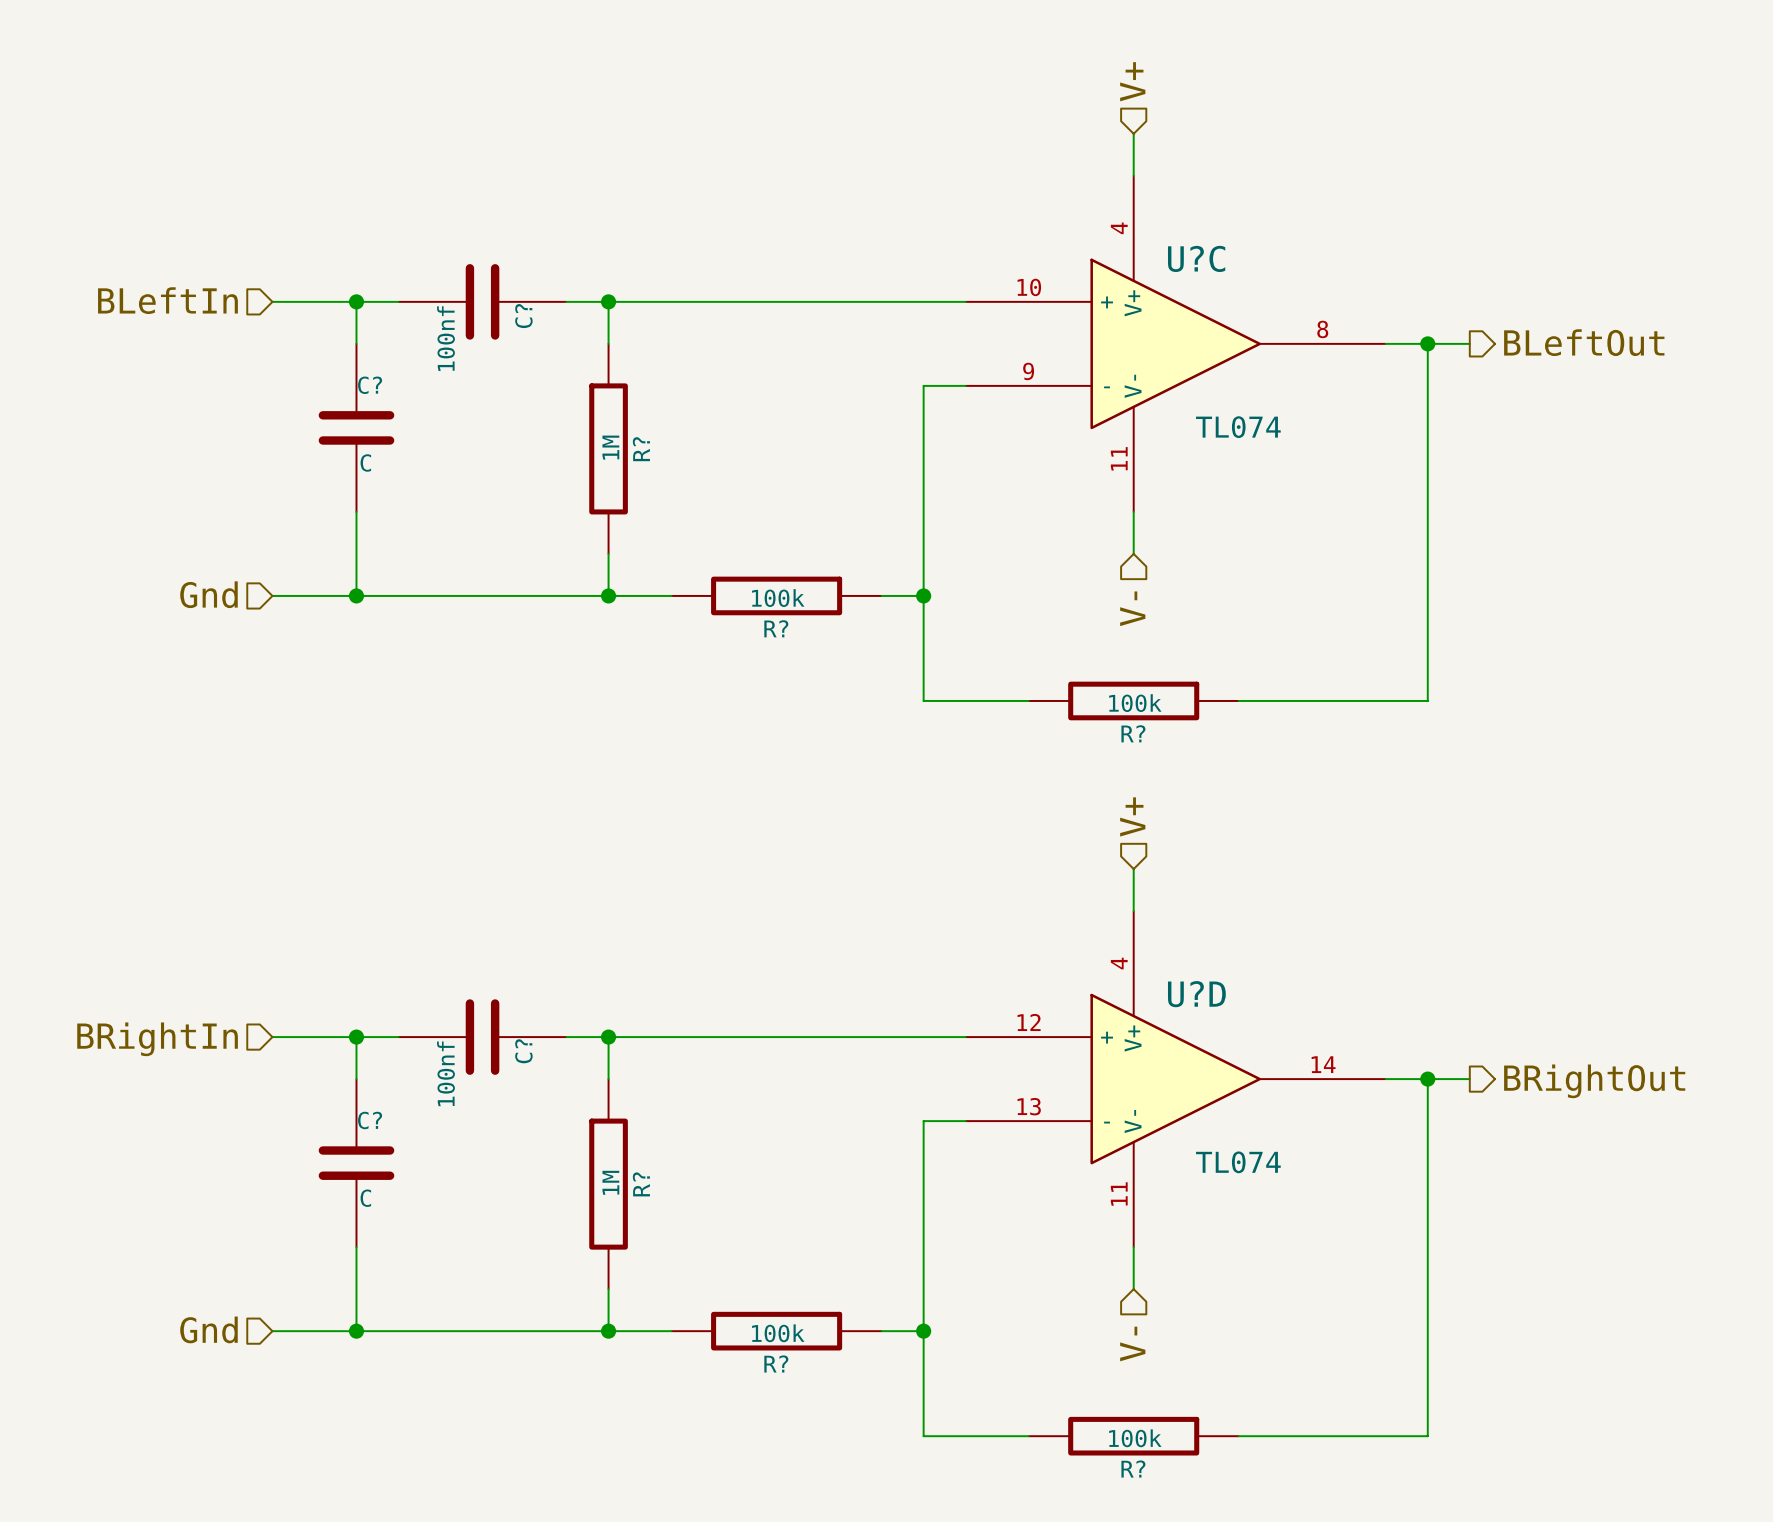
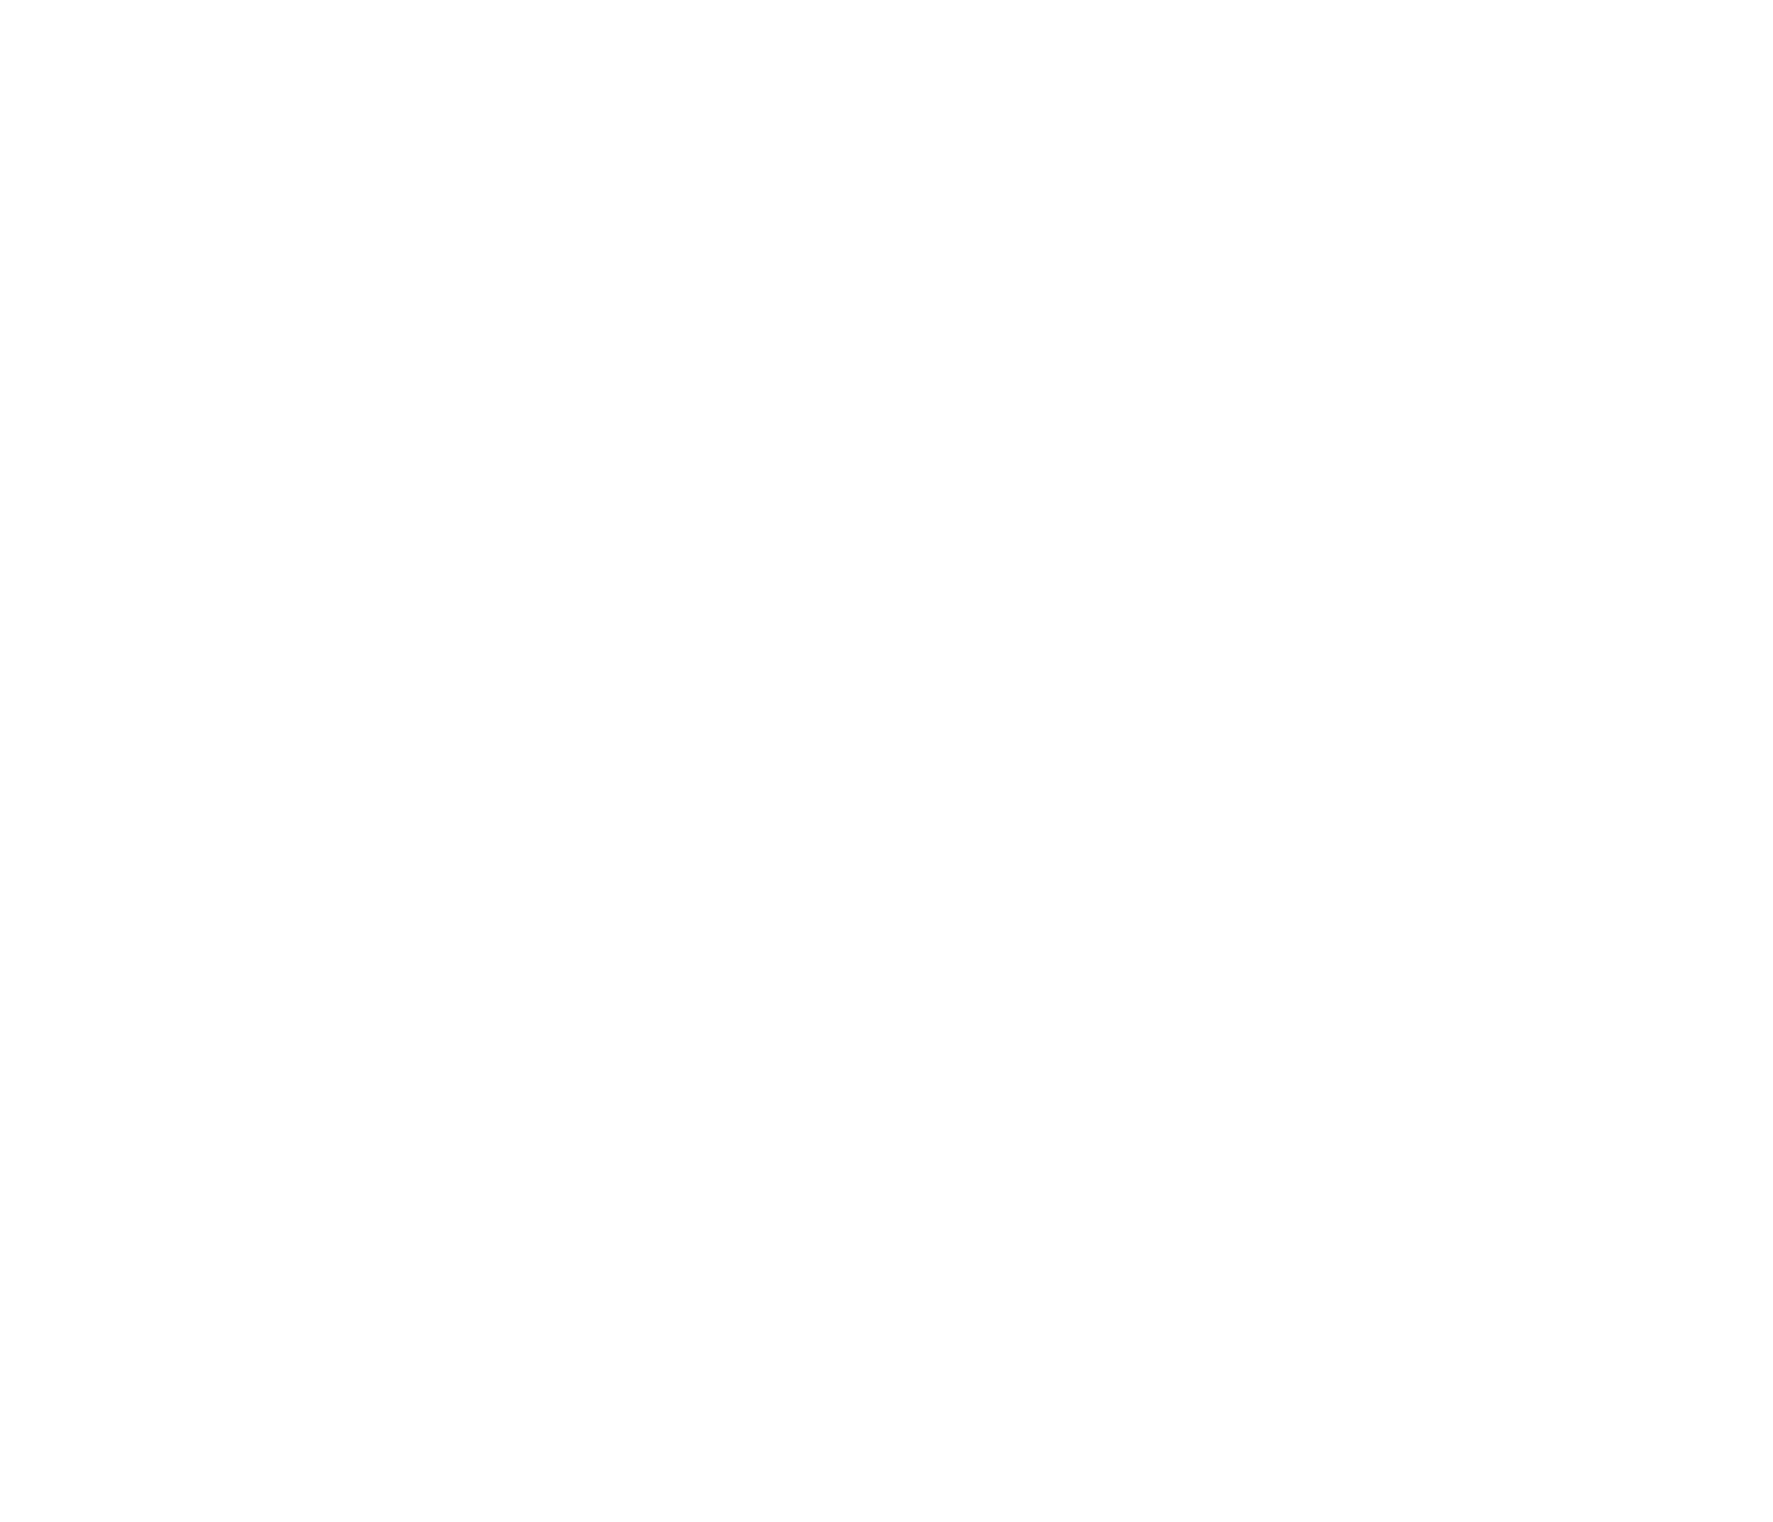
hierarchical label: V+ (1132, 81) -> none
wire: (1133, 133) (1133, 175) -> none
hierarchical label: BLeftIn (167, 300) -> none
wire: (272, 301) (398, 301) -> none
wire: (356, 301) (356, 343) -> none
junction: (356, 301) -> none
C?: 100nf (482, 301) -> none
wire: (566, 301) (965, 301) -> none
wire: (608, 301) (608, 343) -> none
junction: (608, 301) -> none
hierarchical label: BLeftOut (1584, 342) -> none
U?C: TL074 (1175, 343) -> none
wire: (1385, 343) (1469, 343) -> none
wire: (1427, 343) (1427, 700) (1238, 700) -> none
junction: (1427, 343) -> none
wire: (965, 385) (923, 385) (923, 700) (1028, 700) -> none
C?: C (356, 427) -> none
R?: 1M (608, 448) -> none
wire: (356, 511) (356, 595) -> none
wire: (1133, 511) (1133, 553) -> none
wire: (608, 553) (608, 595) -> none
hierarchical label: Gnd (208, 594) -> none
wire: (272, 595) (671, 595) -> none
junction: (356, 595) -> none
junction: (608, 595) -> none
R?: 100k (776, 595) -> none
wire: (881, 595) (923, 595) -> none
junction: (923, 595) -> none
hierarchical label: V- (1132, 608) -> none
R?: 100k (1133, 700) -> none
hierarchical label: V+ (1132, 816) -> none
wire: (1133, 869) (1133, 911) -> none
wire: (272, 1037) (398, 1037) -> none
wire: (356, 1037) (356, 1079) -> none
junction: (356, 1037) -> none
C?: 100nf (482, 1037) -> none
wire: (566, 1037) (965, 1037) -> none
wire: (608, 1037) (608, 1079) -> none
junction: (608, 1037) -> none
hierarchical label: BRightIn (157, 1039) -> none
U?D: TL074 (1175, 1079) -> none
wire: (1385, 1079) (1469, 1079) -> none
wire: (1427, 1079) (1427, 1436) (1238, 1436) -> none
junction: (1427, 1079) -> none
hierarchical label: BRightOut (1594, 1081) -> none
wire: (965, 1121) (923, 1121) (923, 1436) (1028, 1436) -> none
C?: C (356, 1163) -> none
R?: 1M (608, 1184) -> none
wire: (356, 1247) (356, 1331) -> none
wire: (1133, 1247) (1133, 1289) -> none
wire: (608, 1289) (608, 1331) -> none
hierarchical label: Gnd (208, 1329) -> none
wire: (272, 1331) (671, 1331) -> none
junction: (356, 1331) -> none
junction: (608, 1331) -> none
R?: 100k (776, 1331) -> none
wire: (881, 1331) (923, 1331) -> none
junction: (923, 1331) -> none
hierarchical label: V- (1132, 1343) -> none
R?: 100k (1133, 1436) -> none

